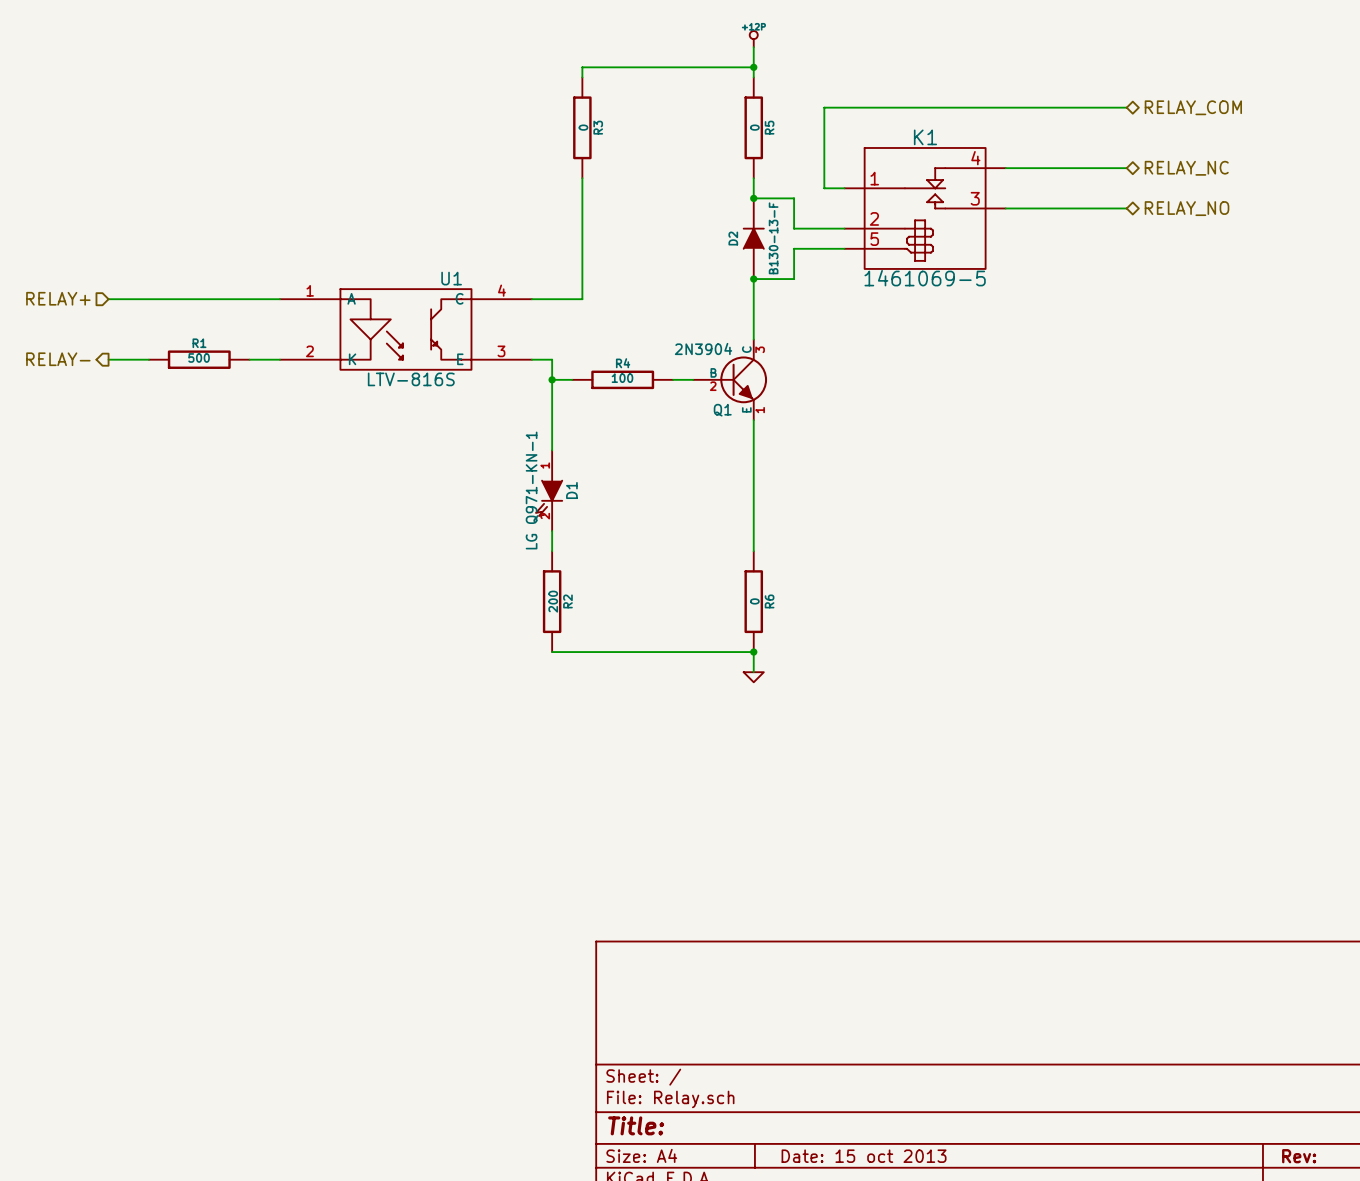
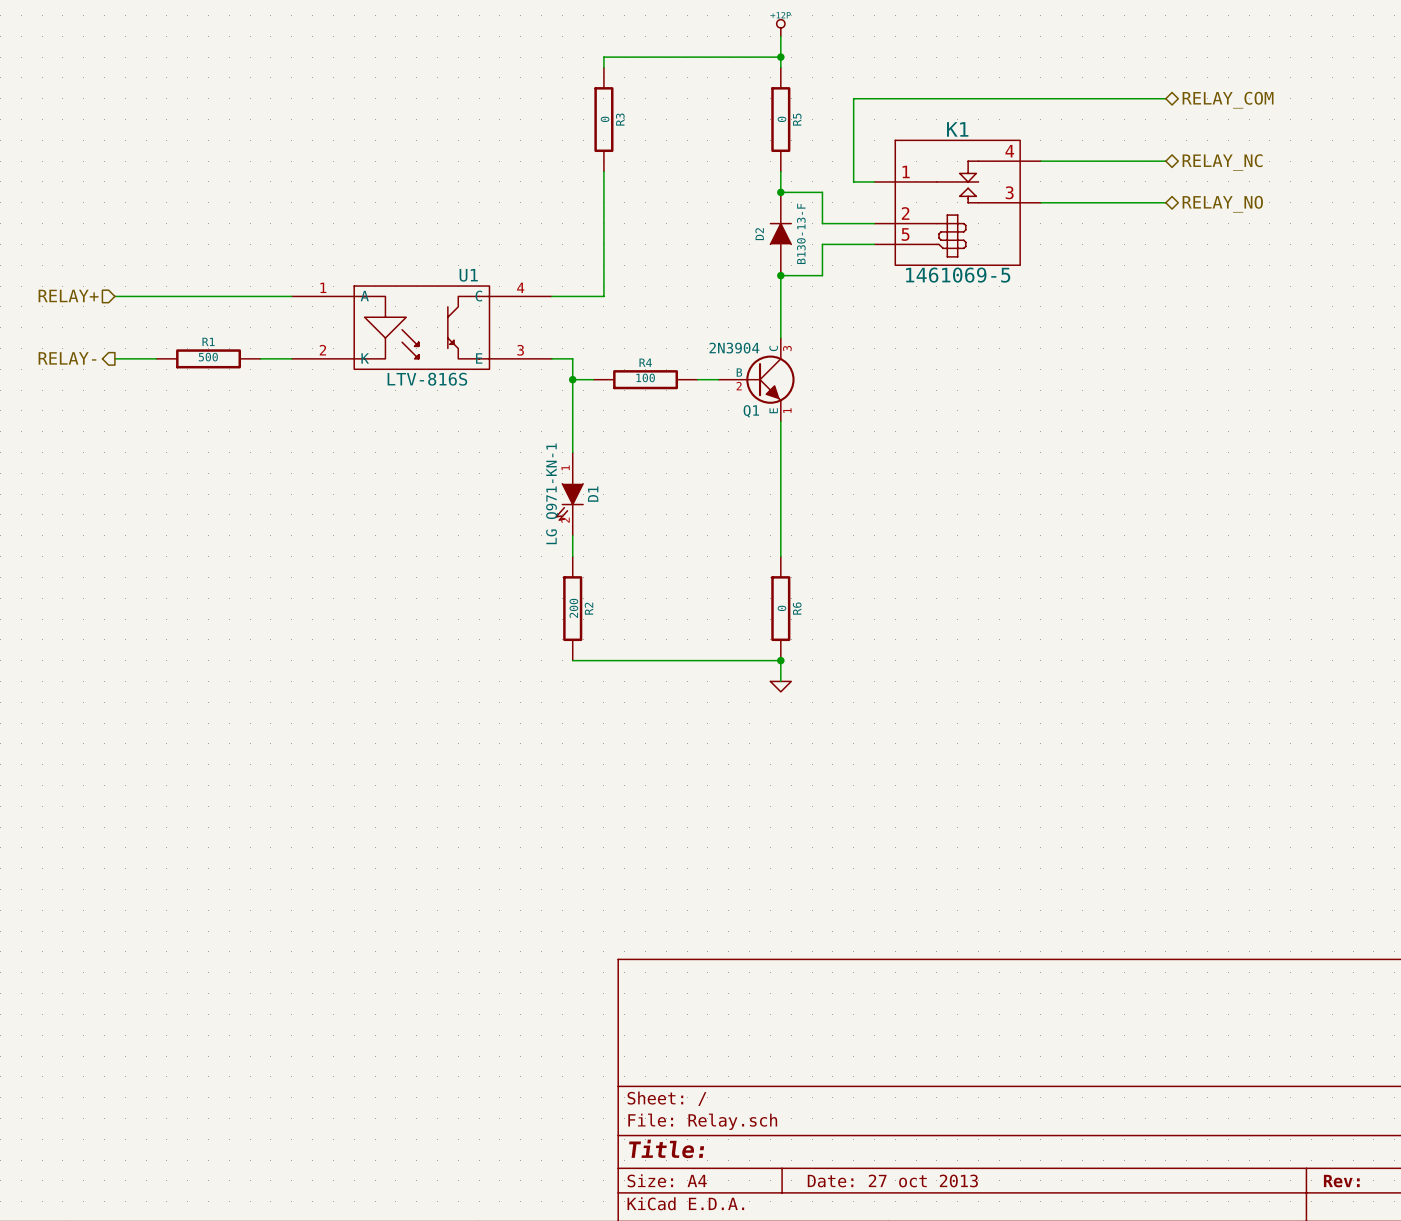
title block: Date: 15 oct 2013 (864, 1156) -> Date: 27 oct 2013 (892, 1180)

